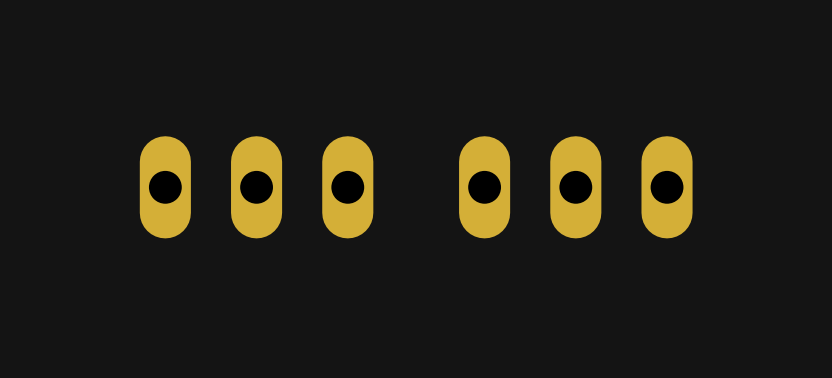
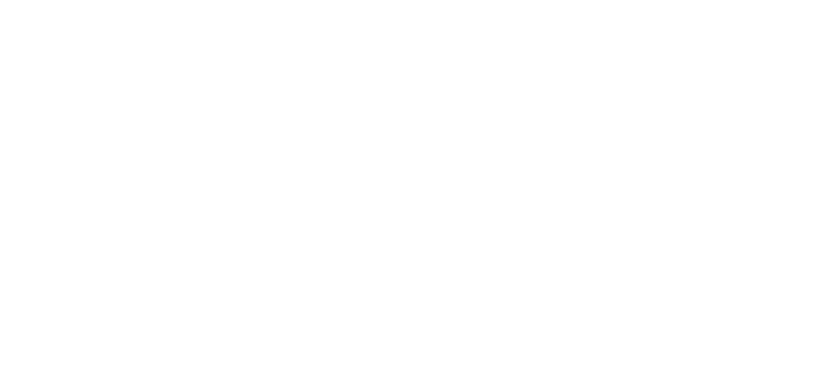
part: (256, 187) -> none
part: (575, 187) -> none

